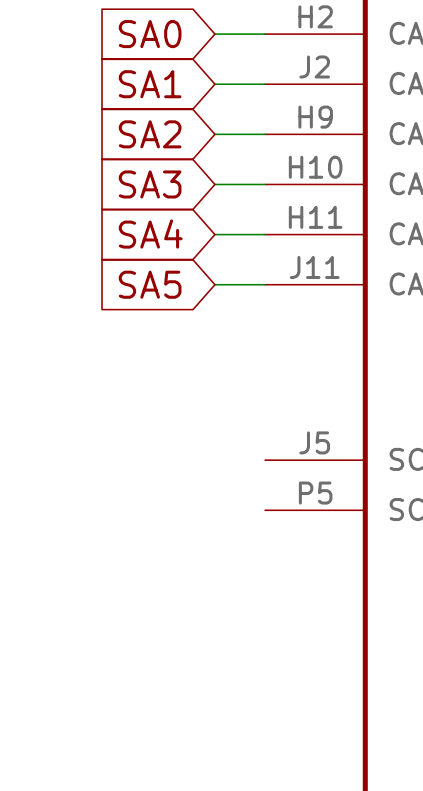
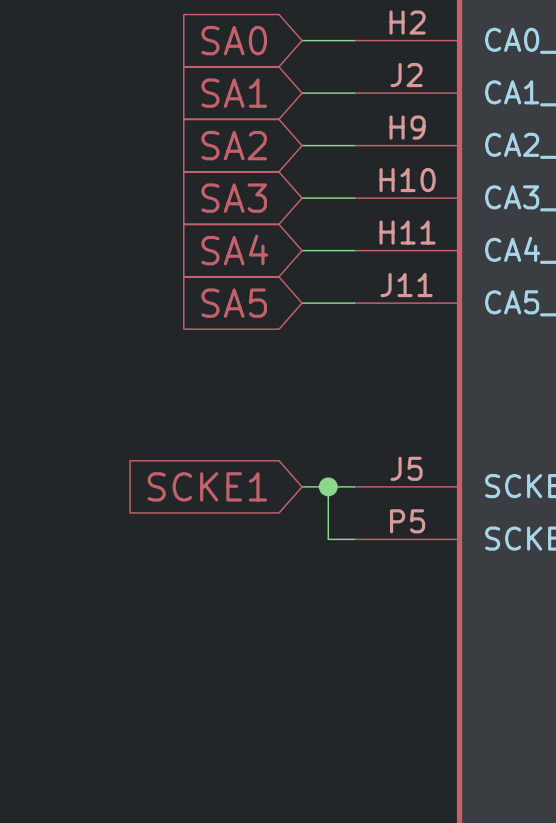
global label: none -> SCKE1 (207, 486)
wire: none -> (302, 486) (354, 486)
wire: none -> (328, 486) (328, 539) (354, 539)
junction: none -> (328, 486)

